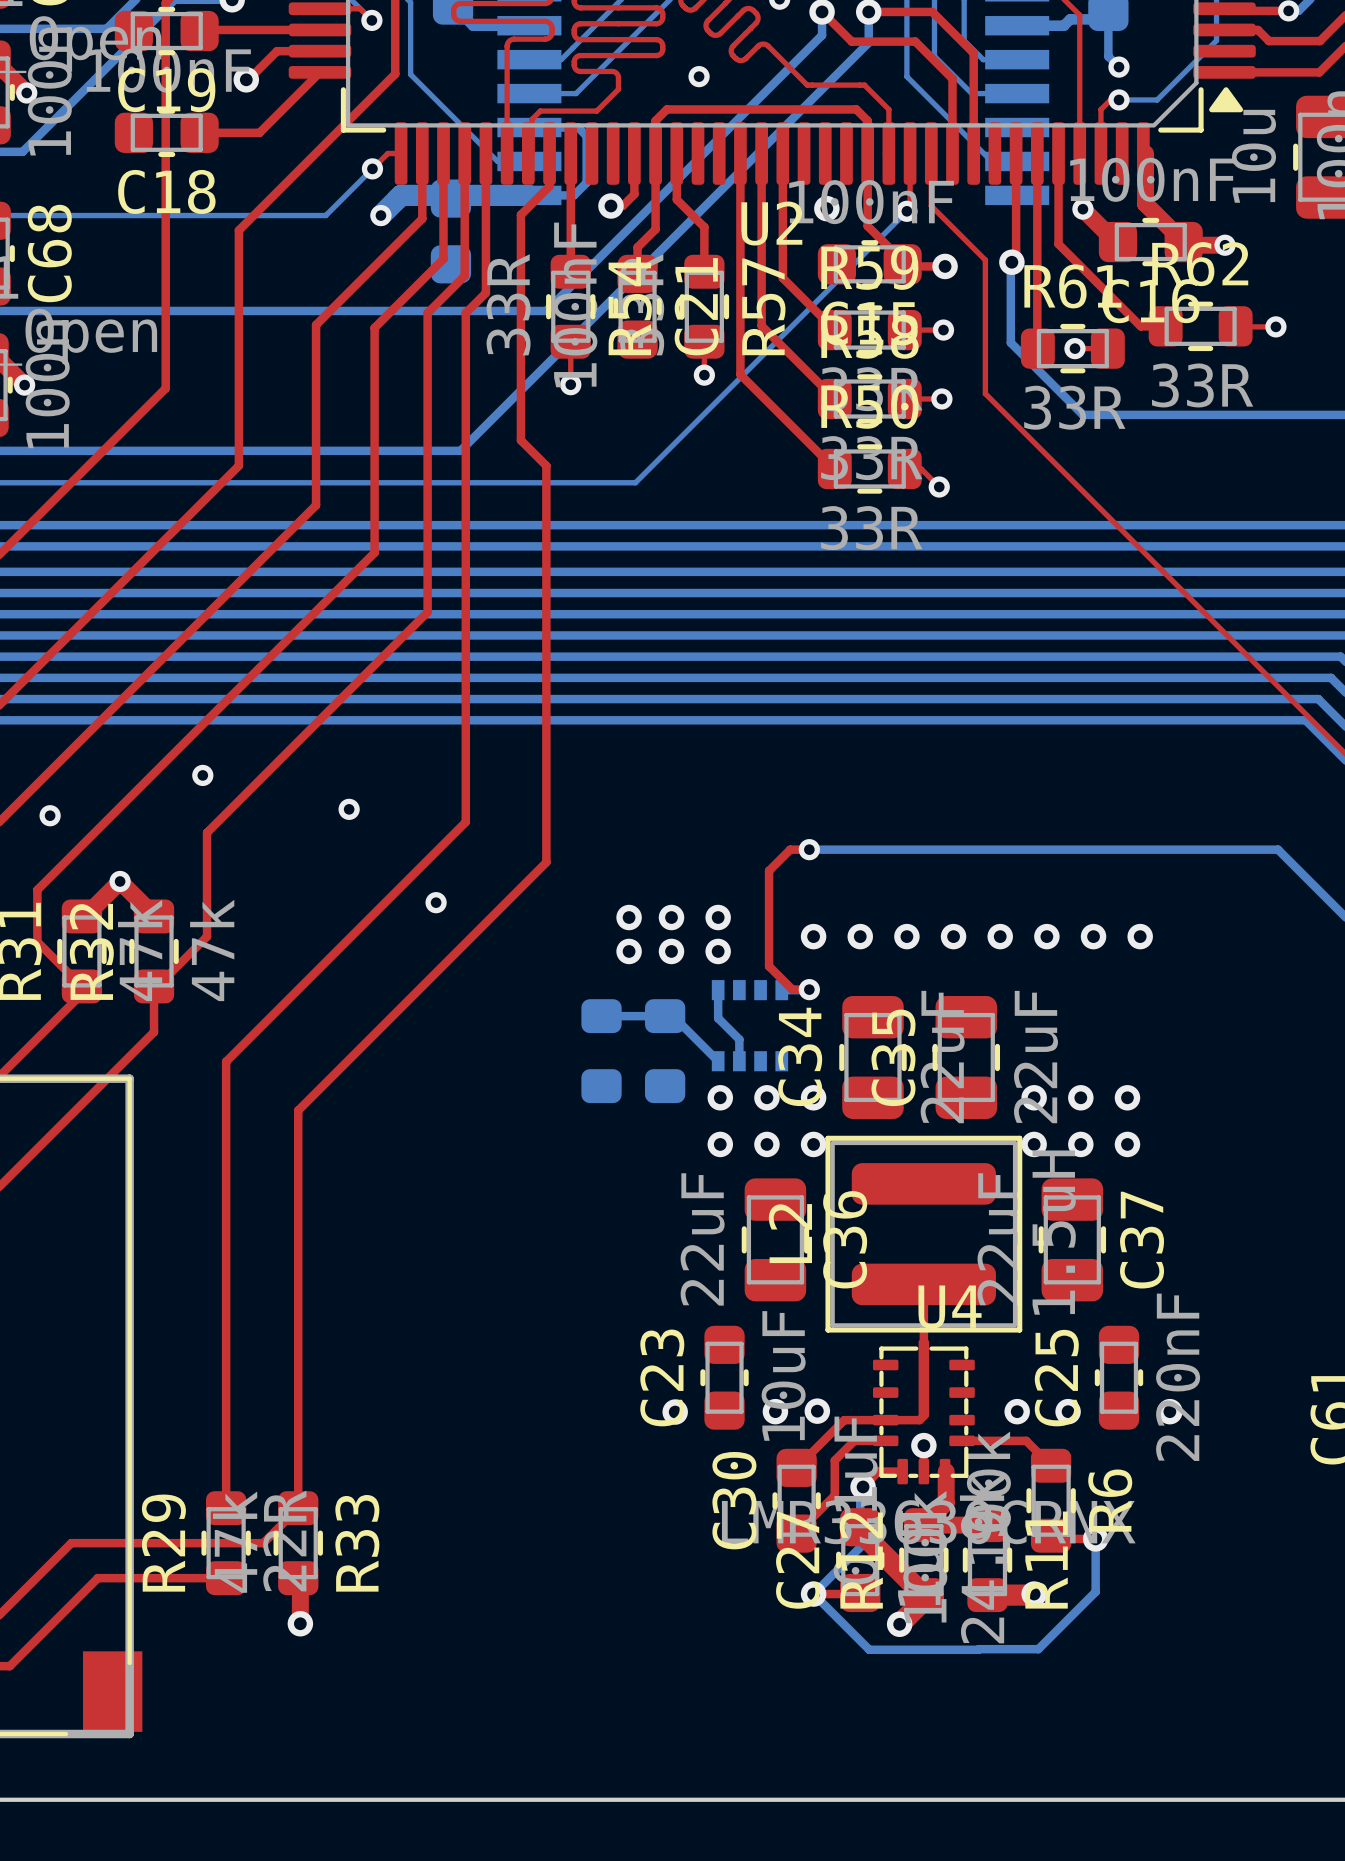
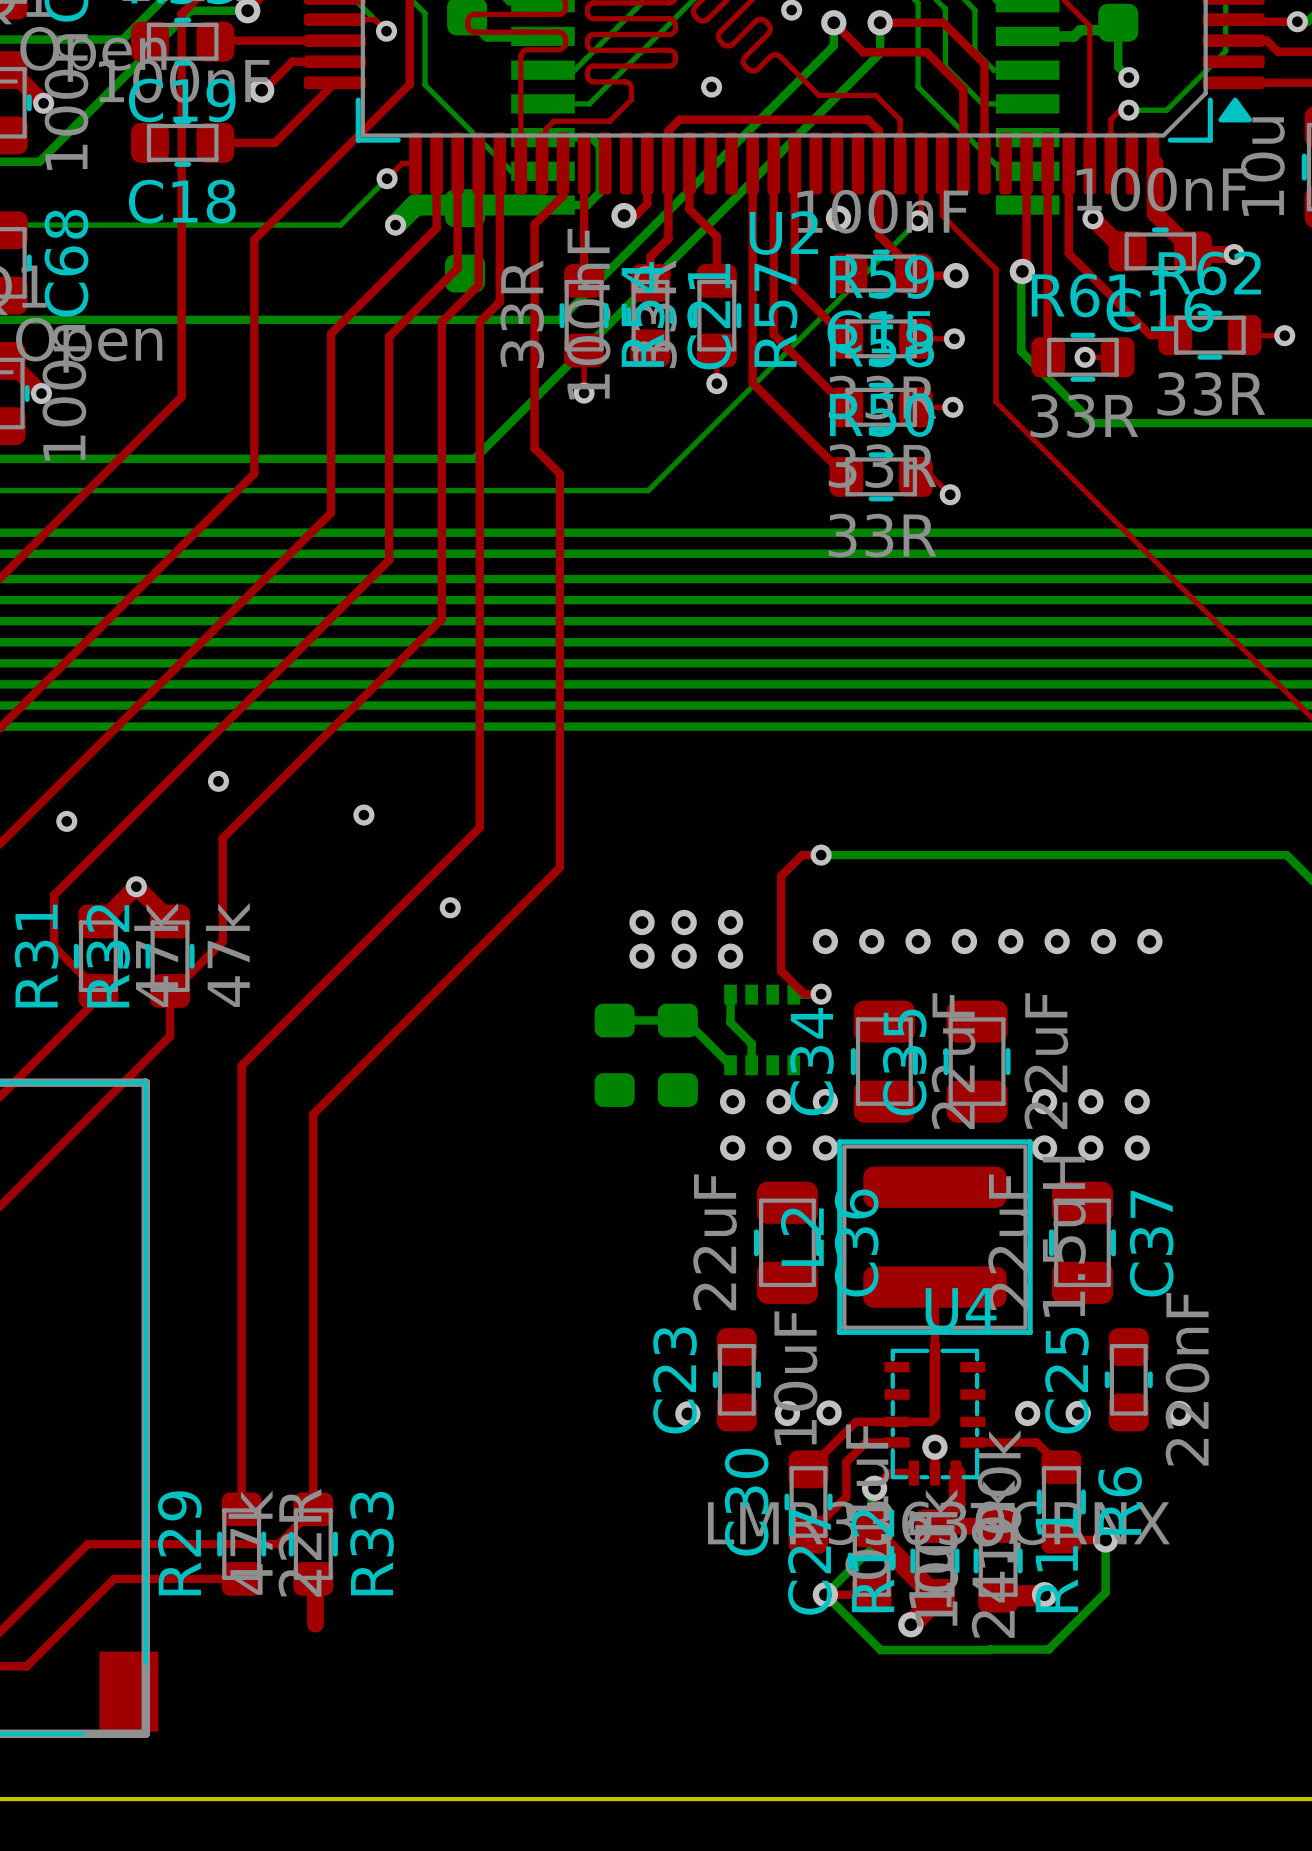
via: (300, 1623) -> none

